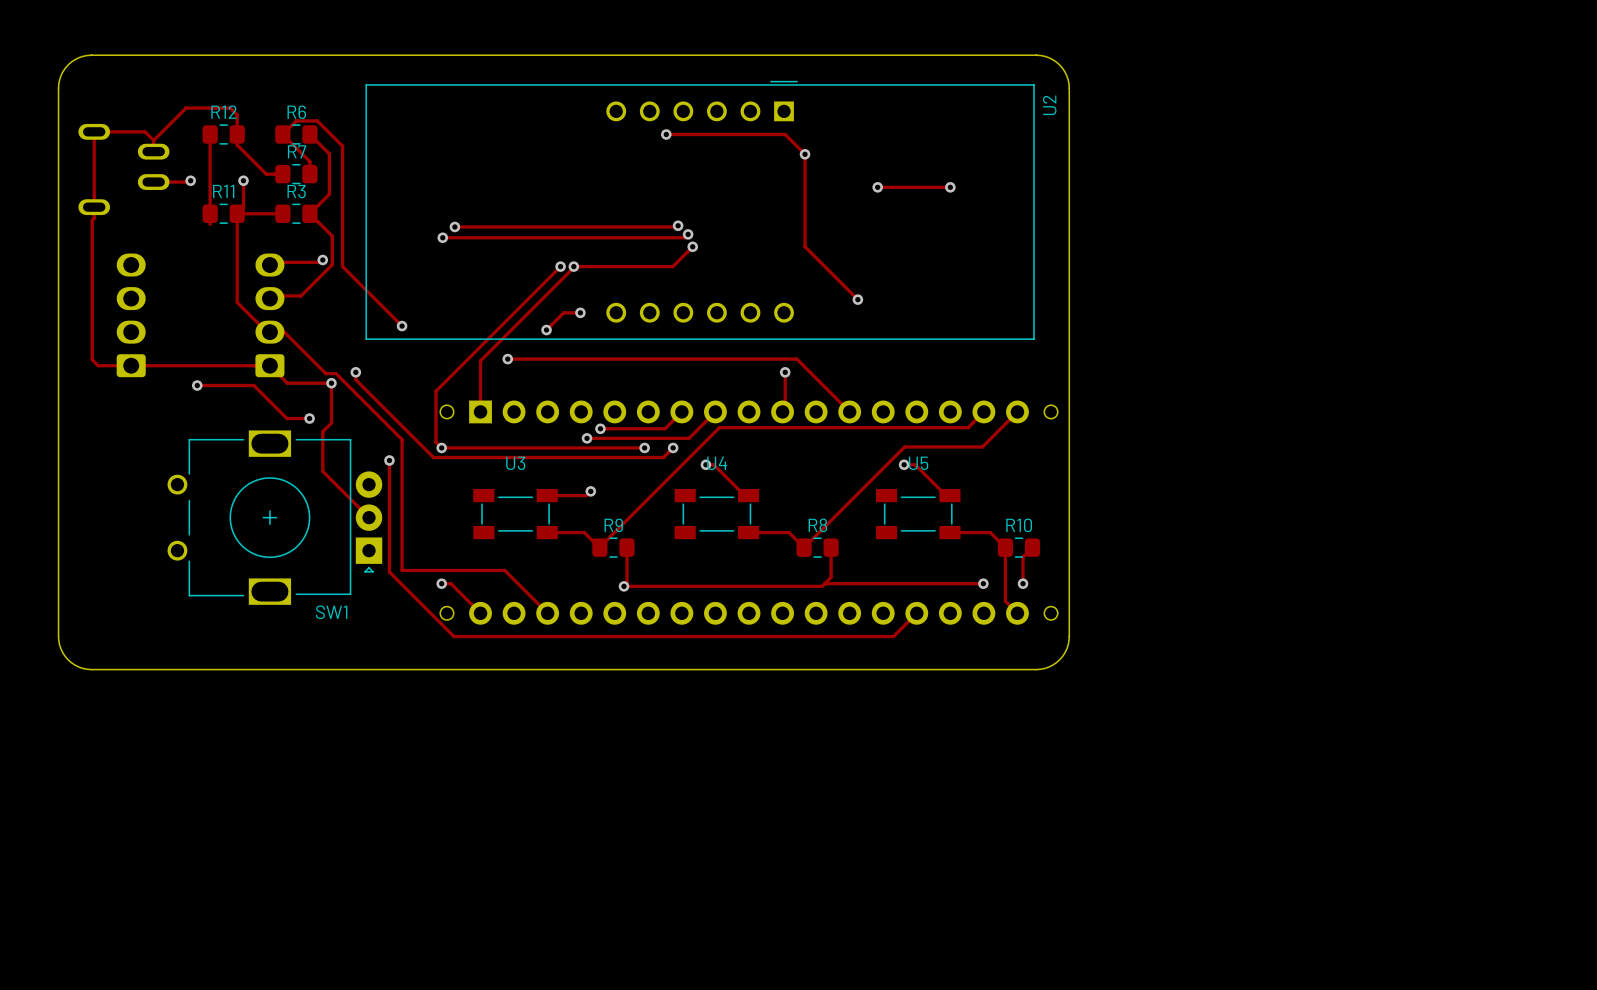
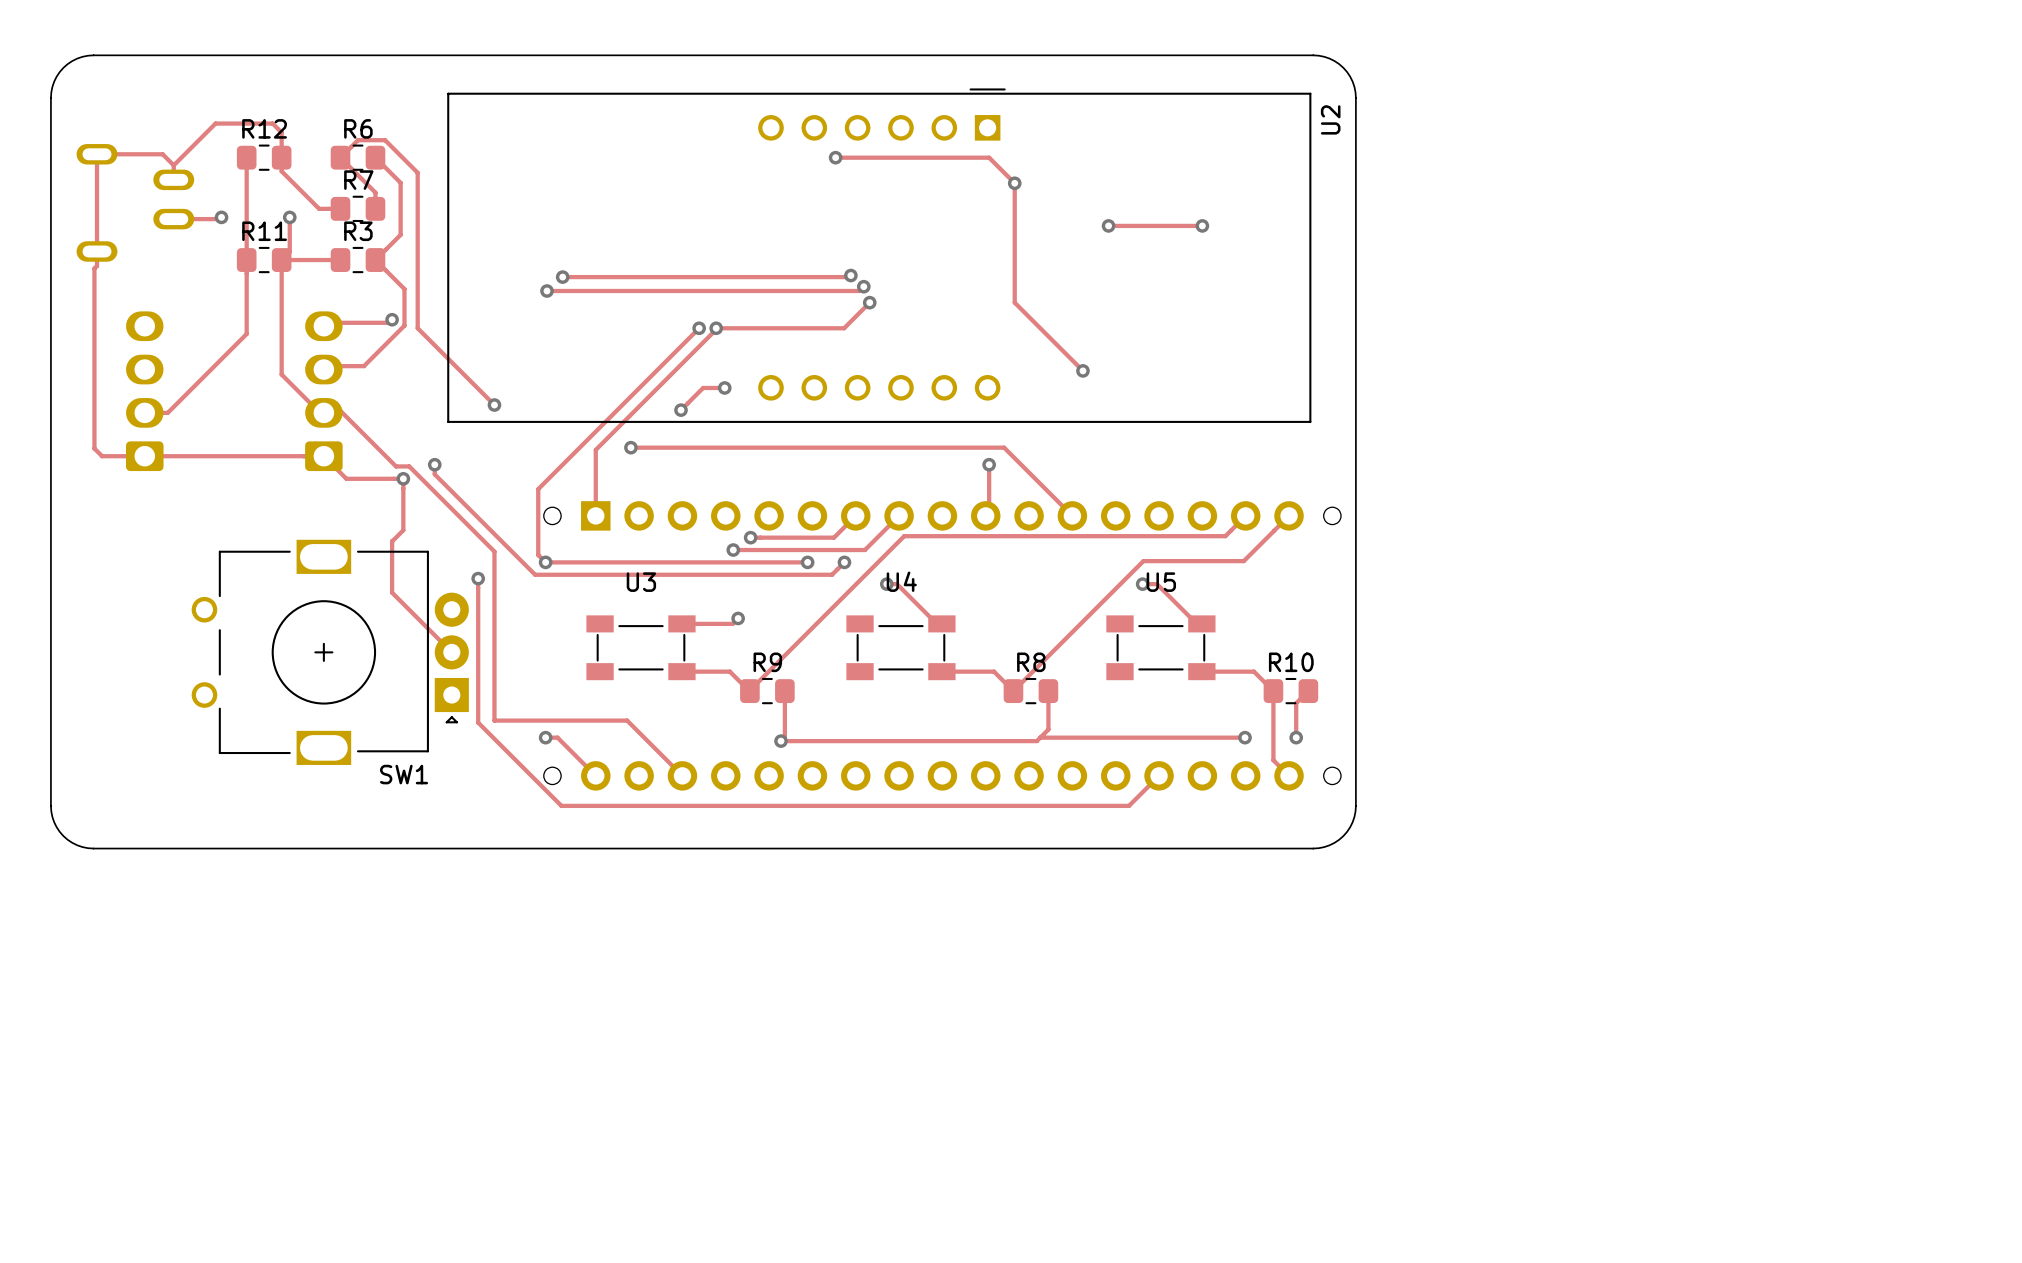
track: none -> (246, 273) (246, 333) (167, 412) (144, 412)
track: (197, 385) (253, 385) (286, 418) (309, 418) -> none
via: (197, 385) -> none
via: (309, 418) -> none

